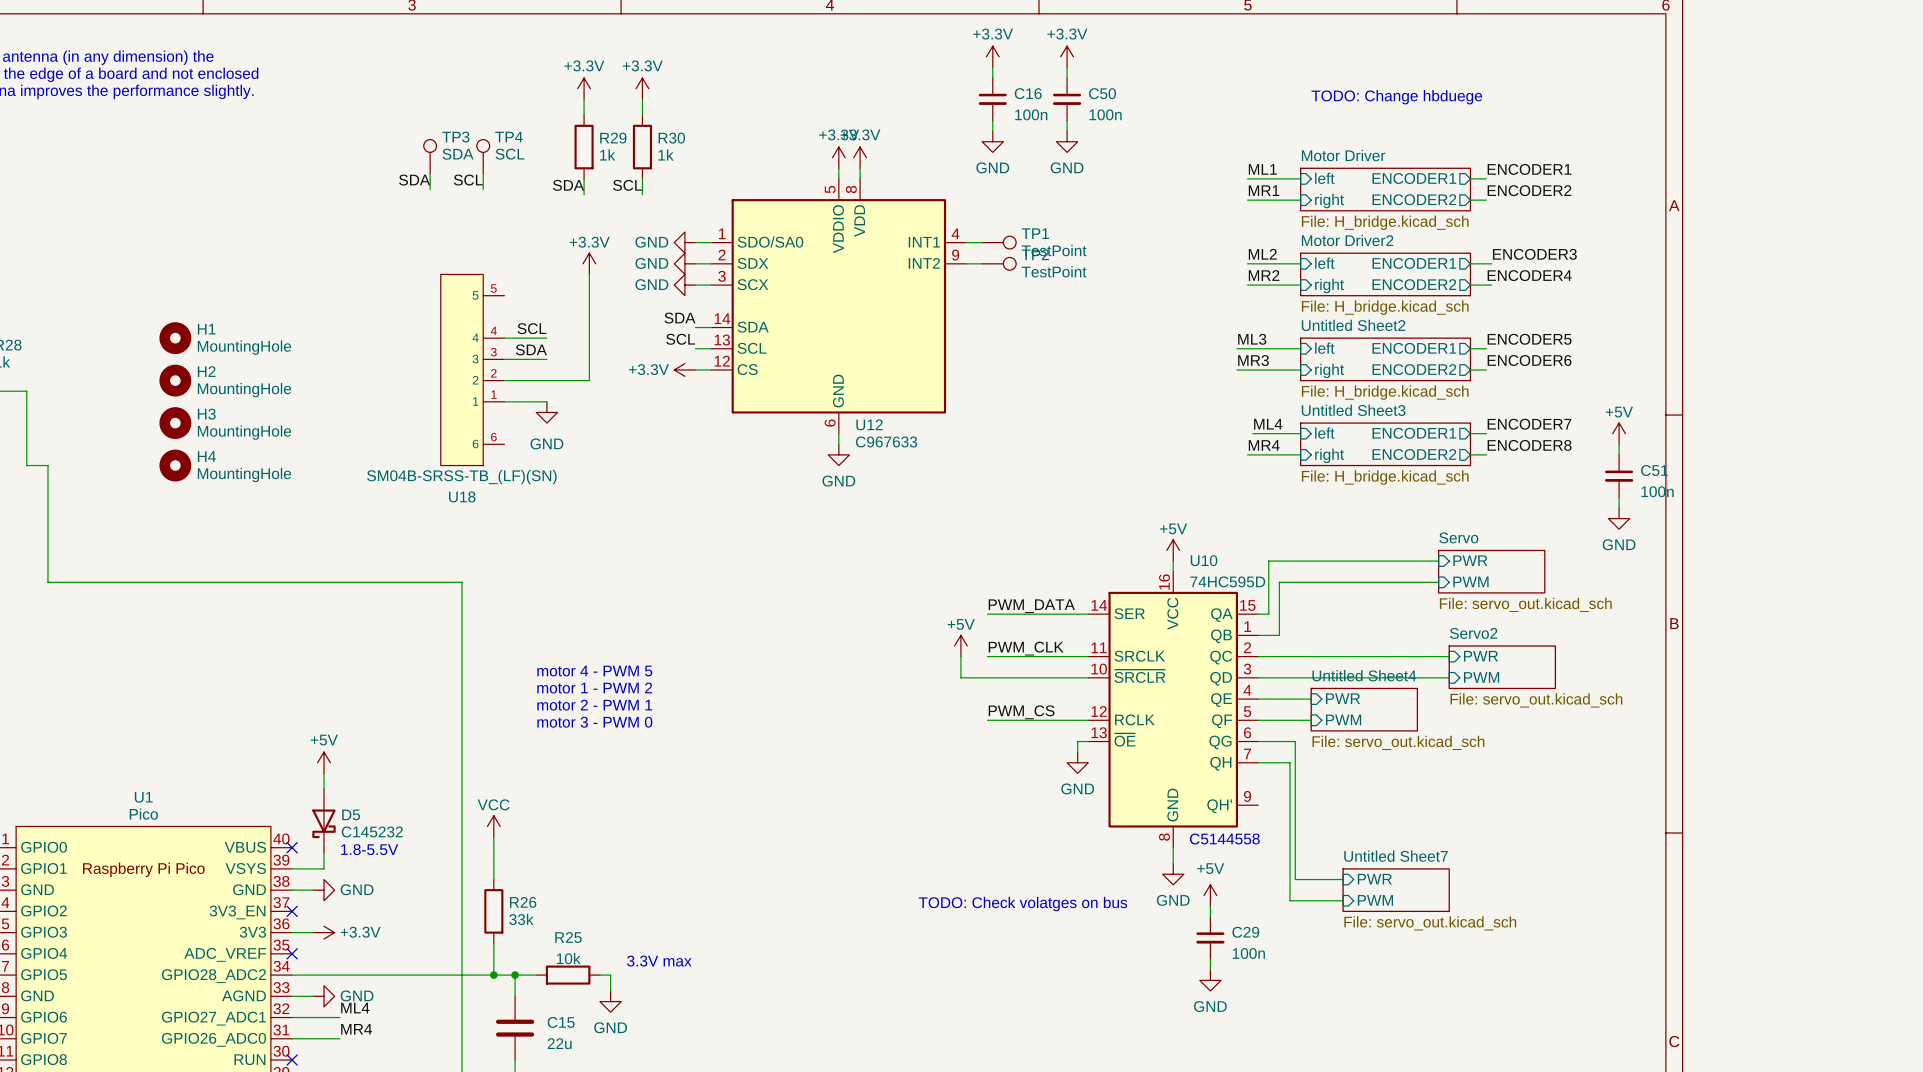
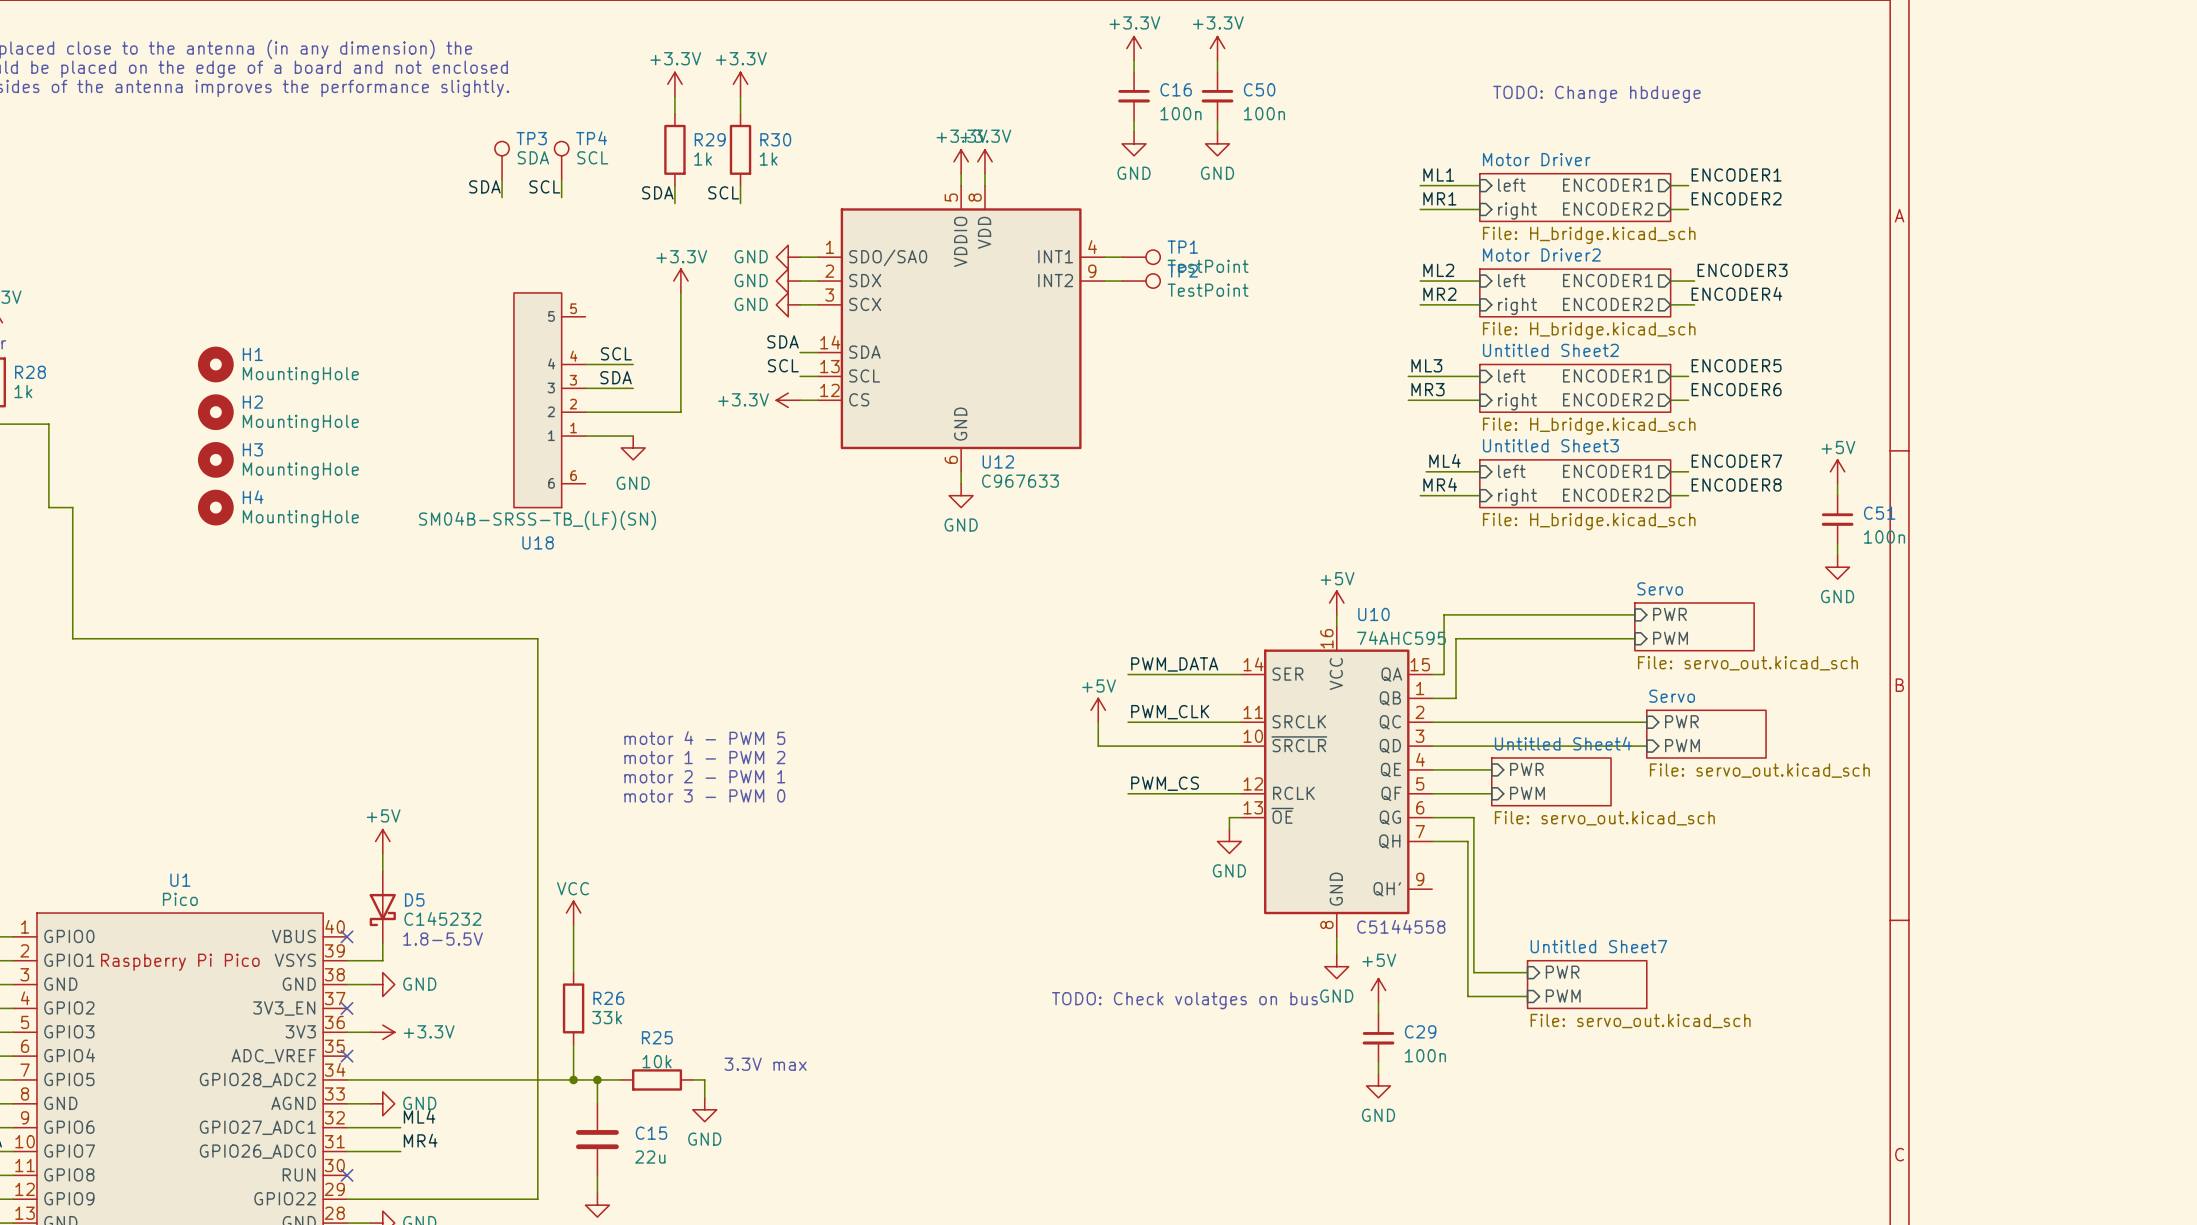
U10 value: 74HC595D (1227, 581) -> 74AHC595 (1401, 638)
sheet Servo2 name: Servo2 (1473, 633) -> Servo (1672, 696)

